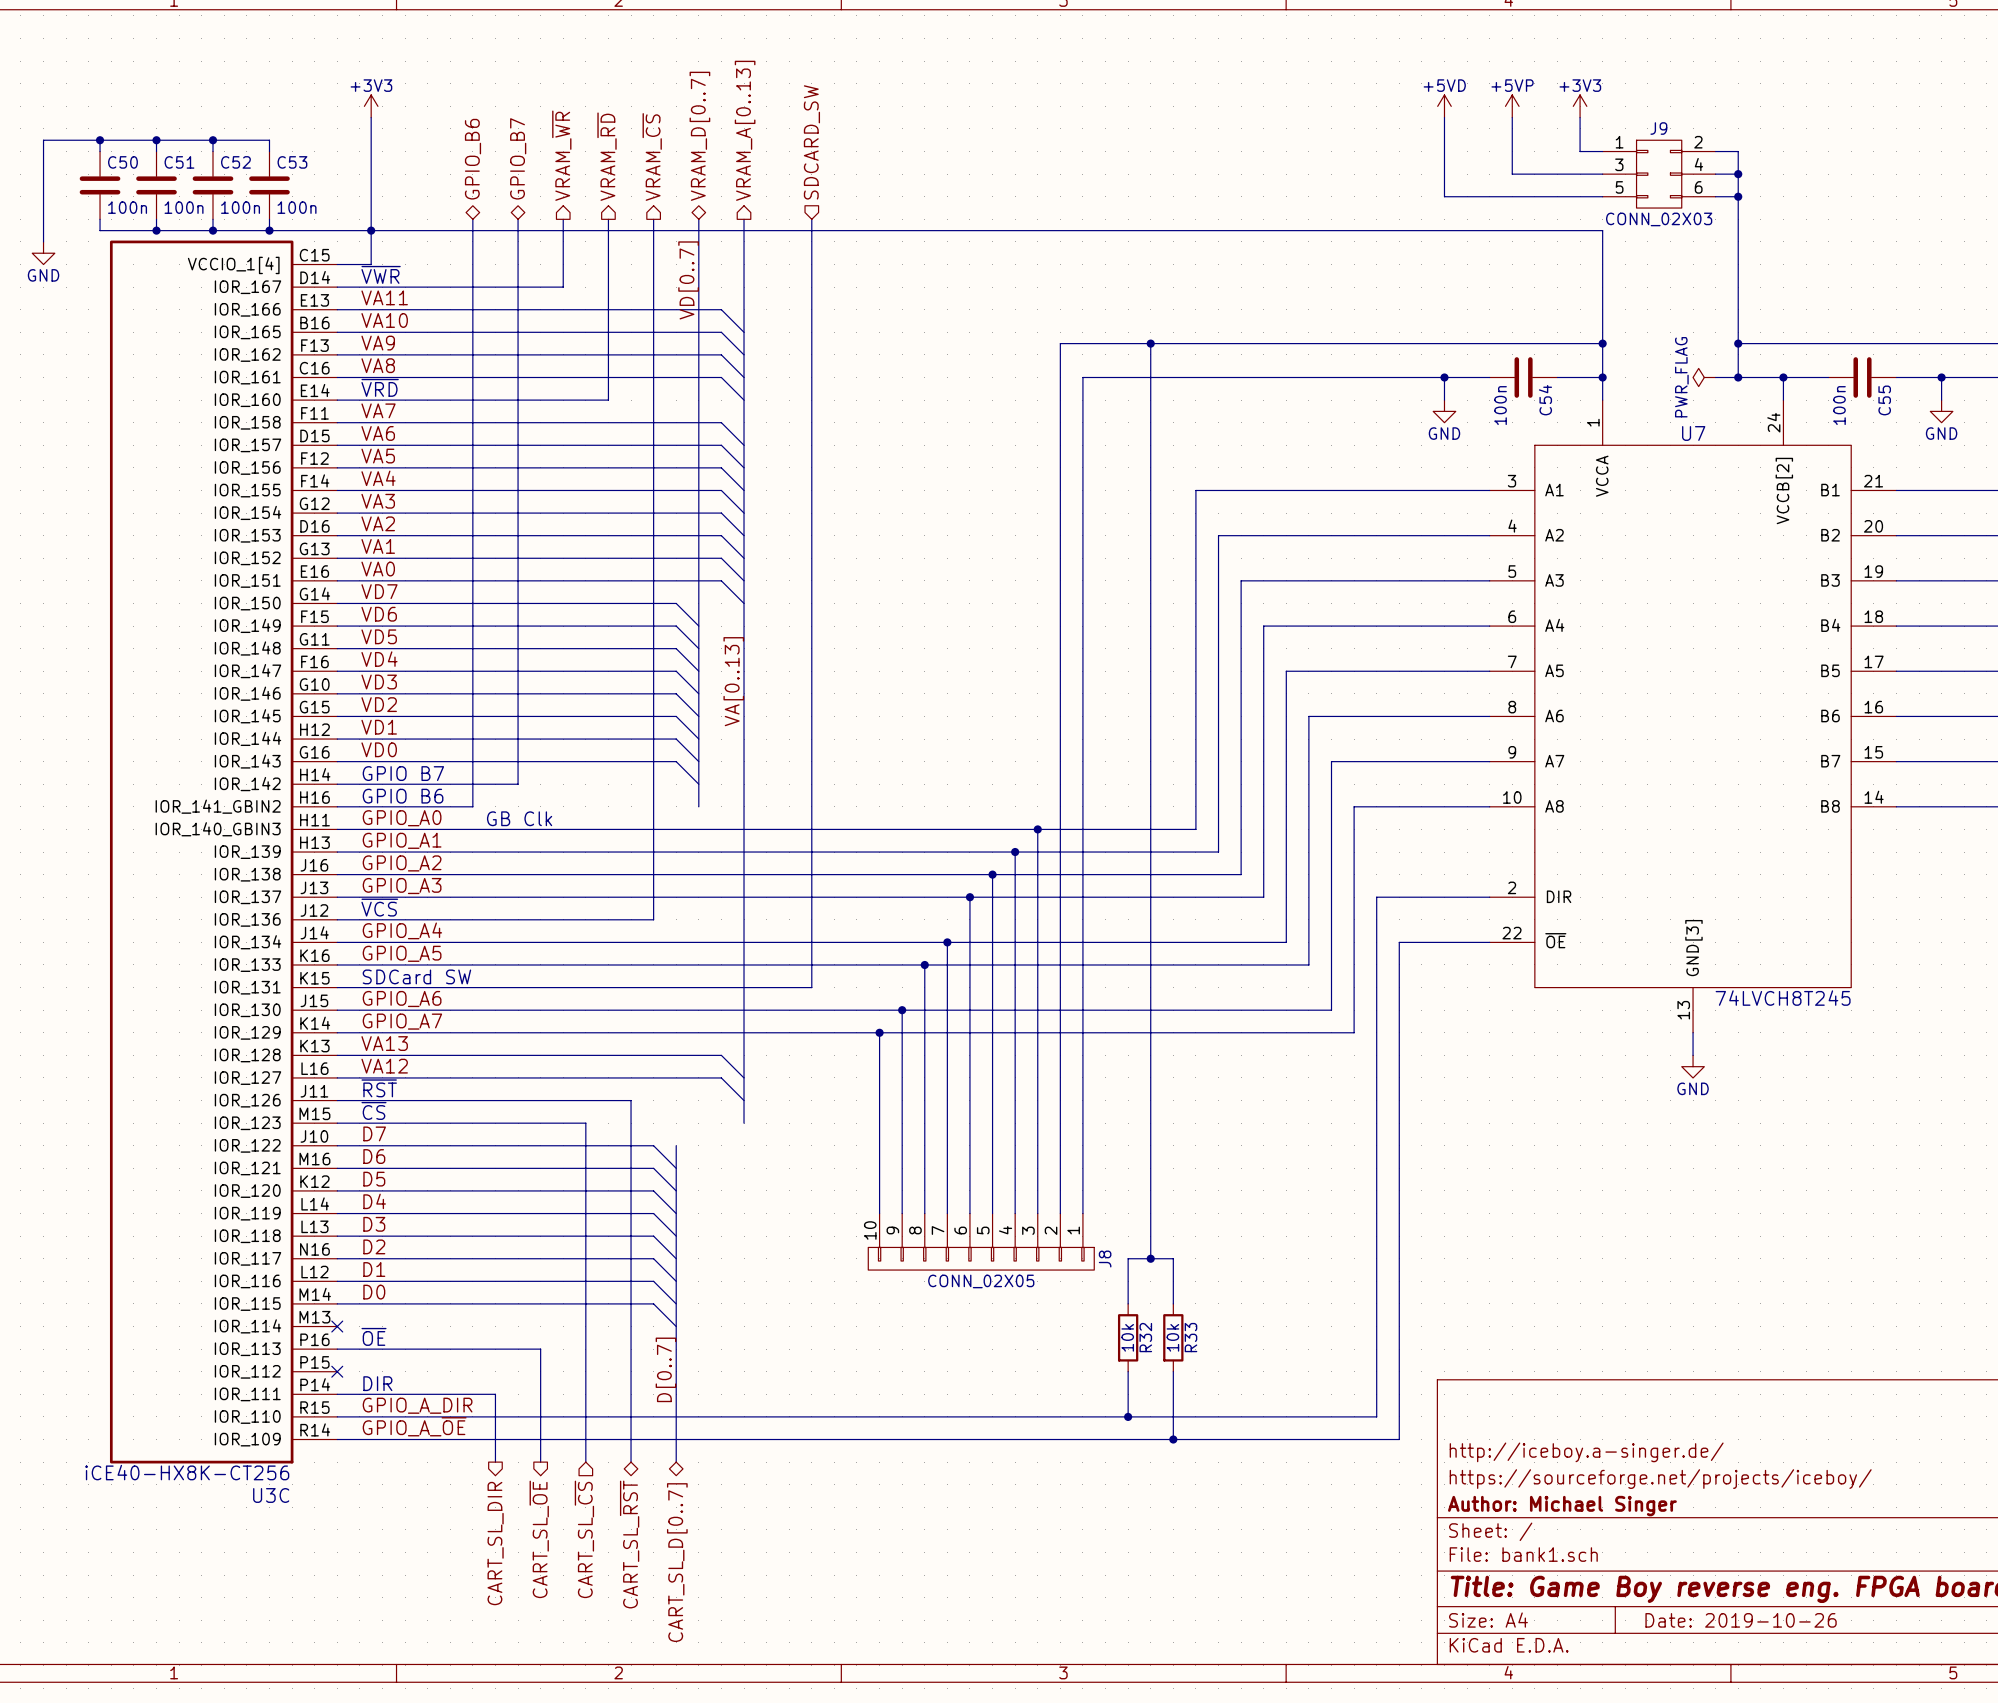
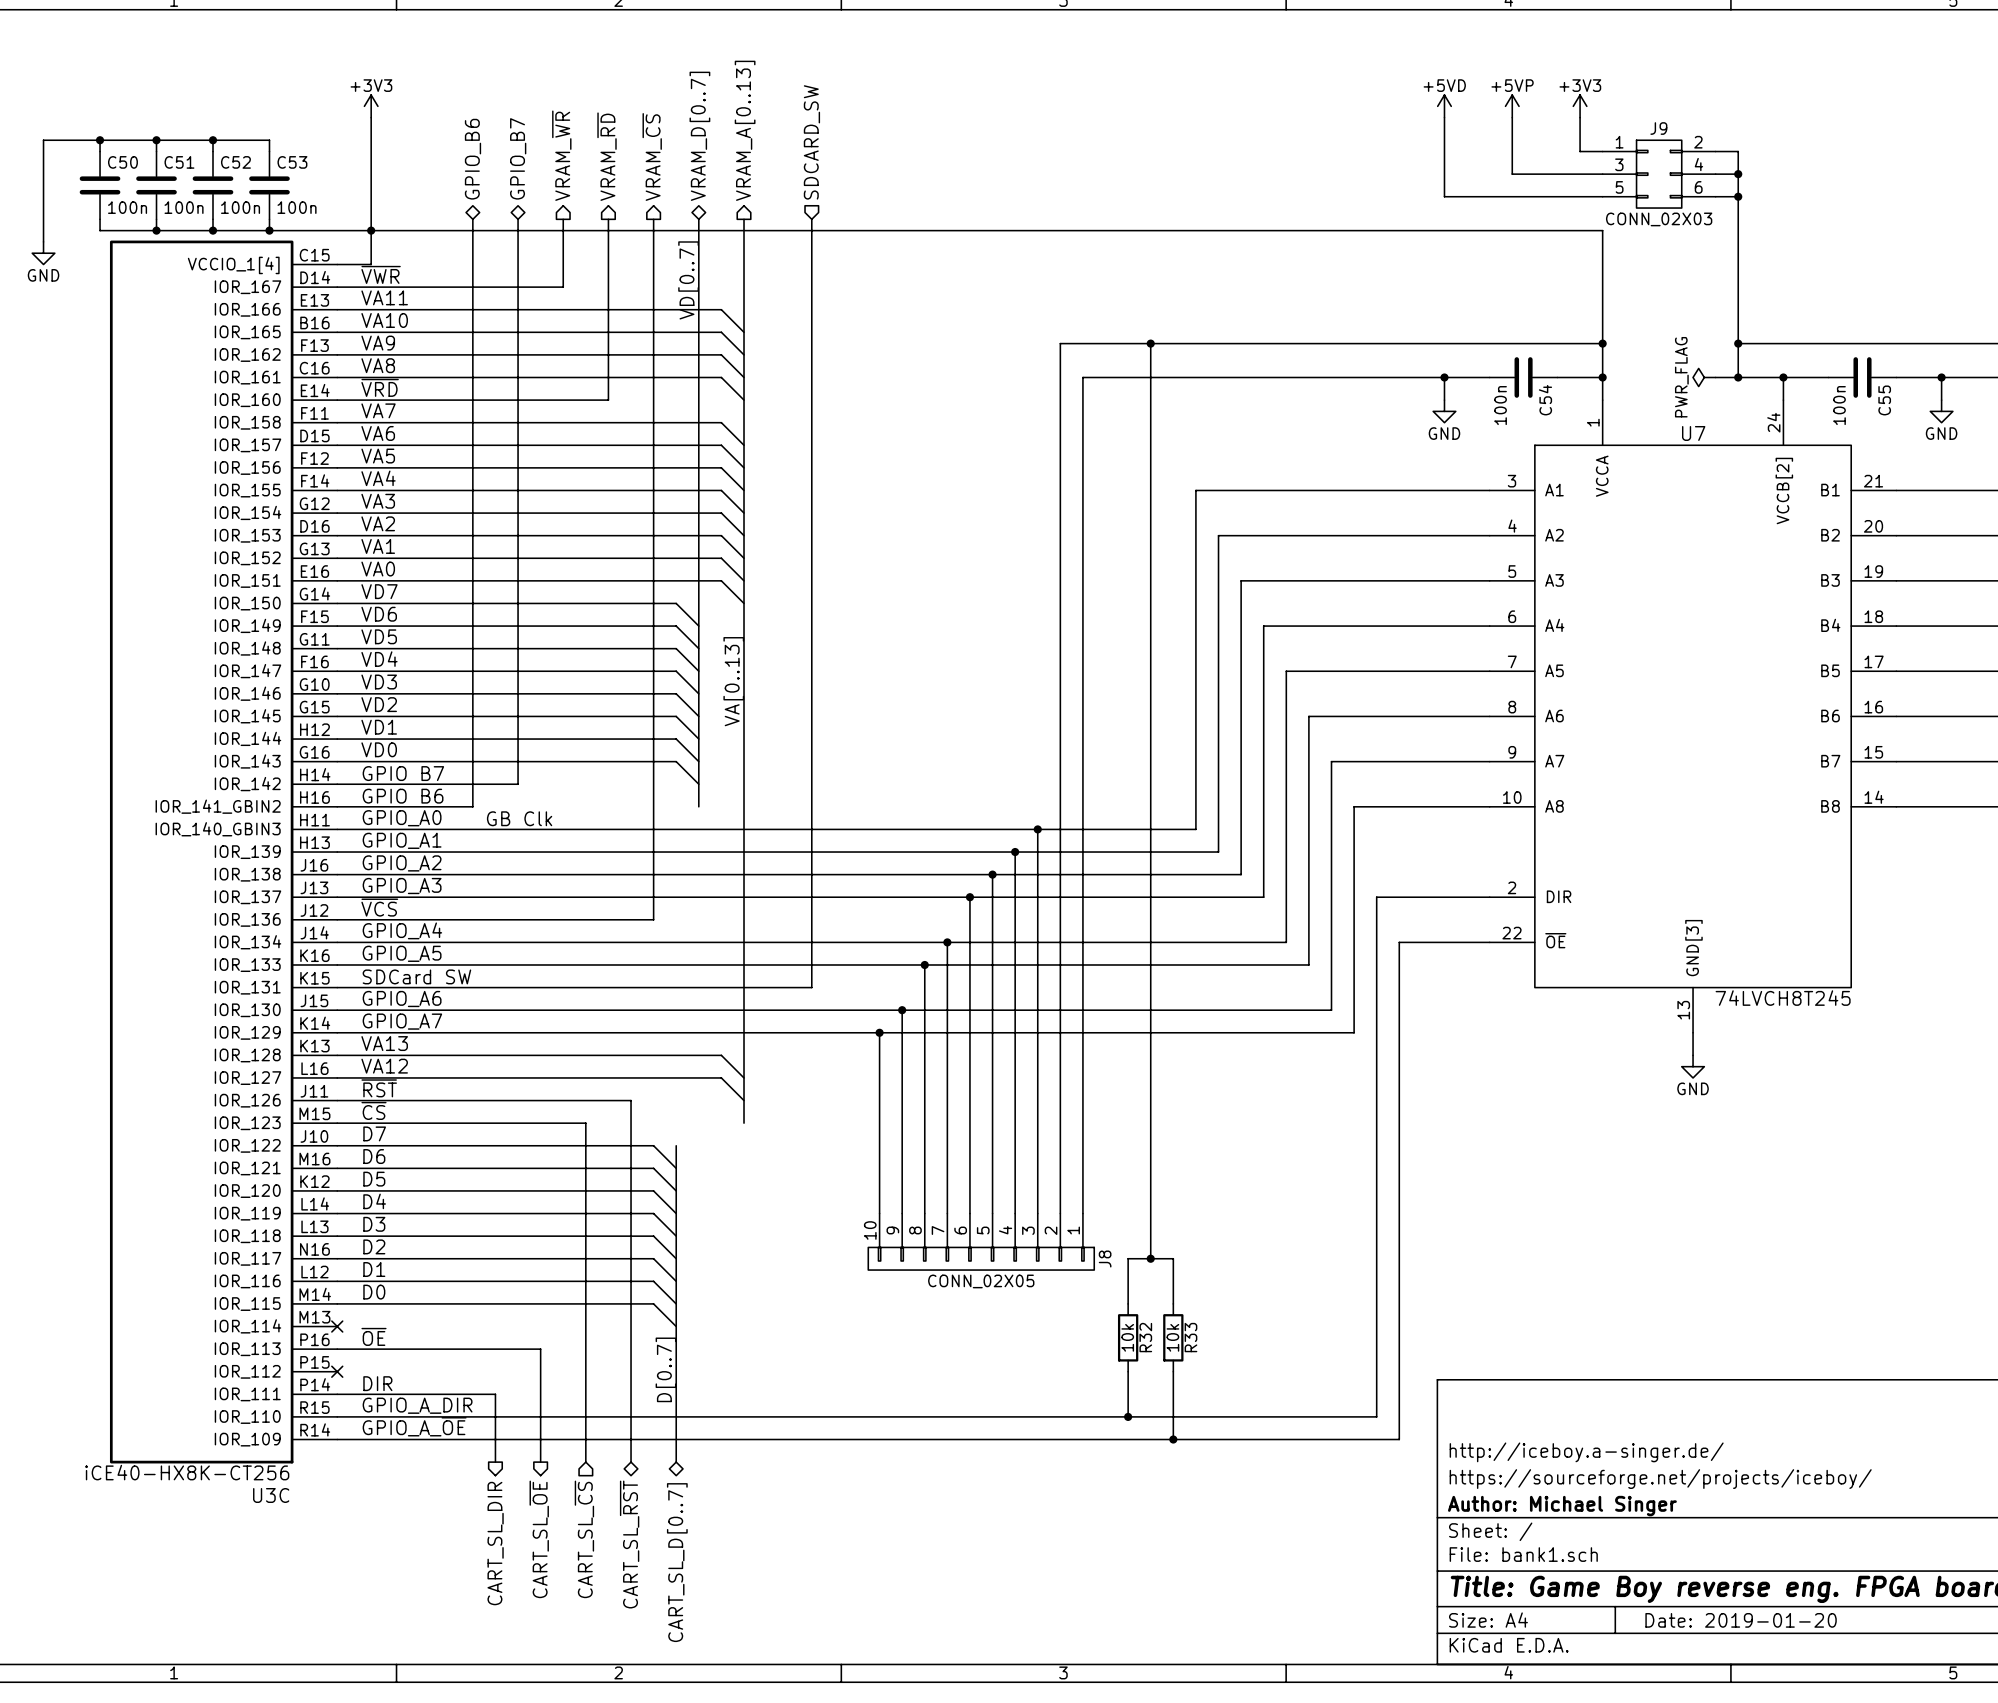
title block: Date: 2019-10-26 (1741, 1620) -> Date: 2019-01-20 (1741, 1620)

